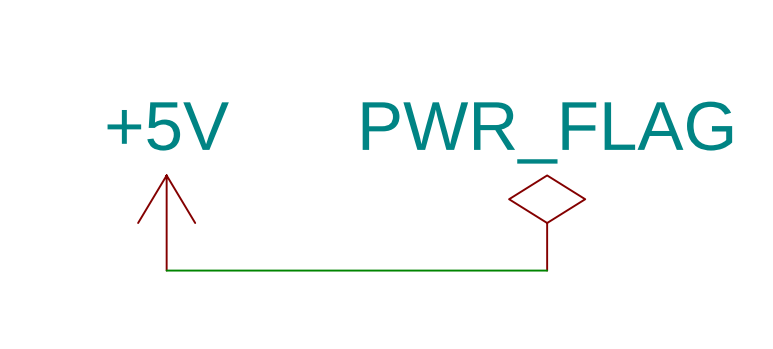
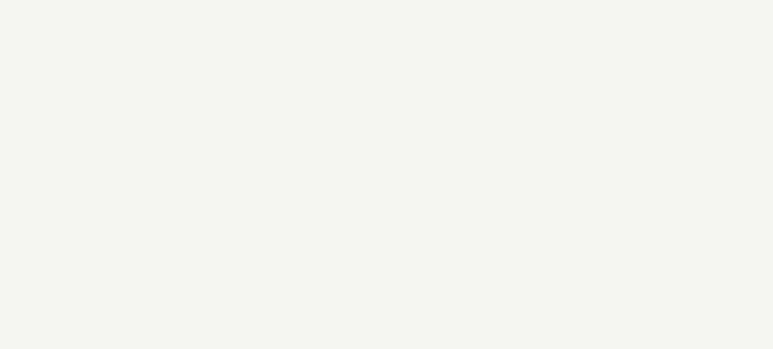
power symbol: +5V (166, 223) -> none
power symbol: PWR_FLAG (547, 223) -> none
wire: (166, 270) (547, 270) -> none

